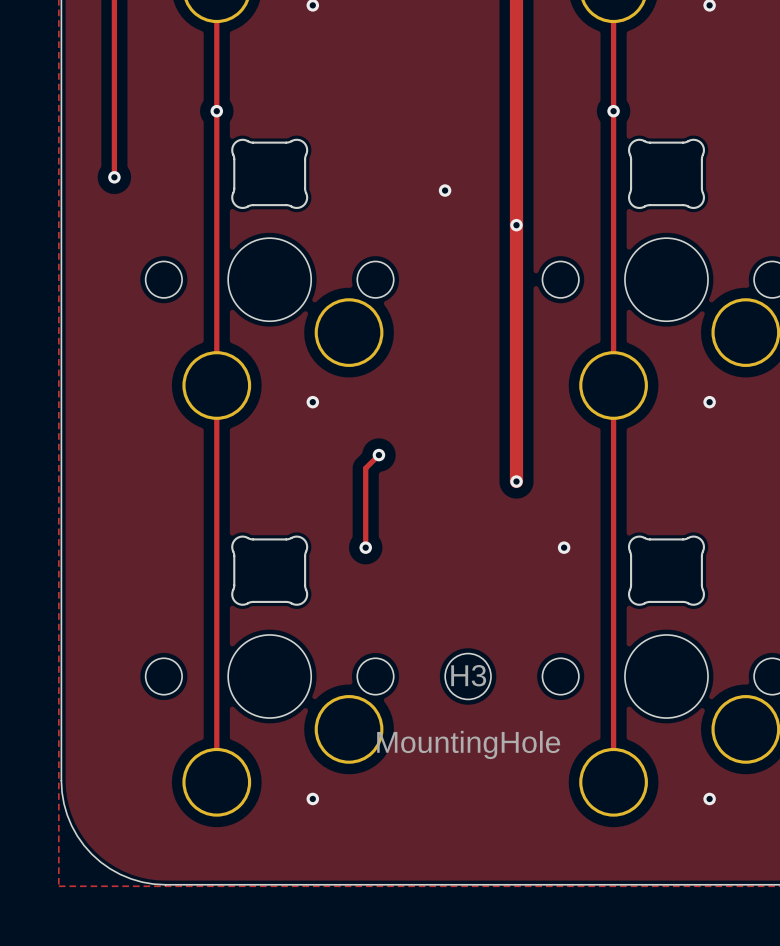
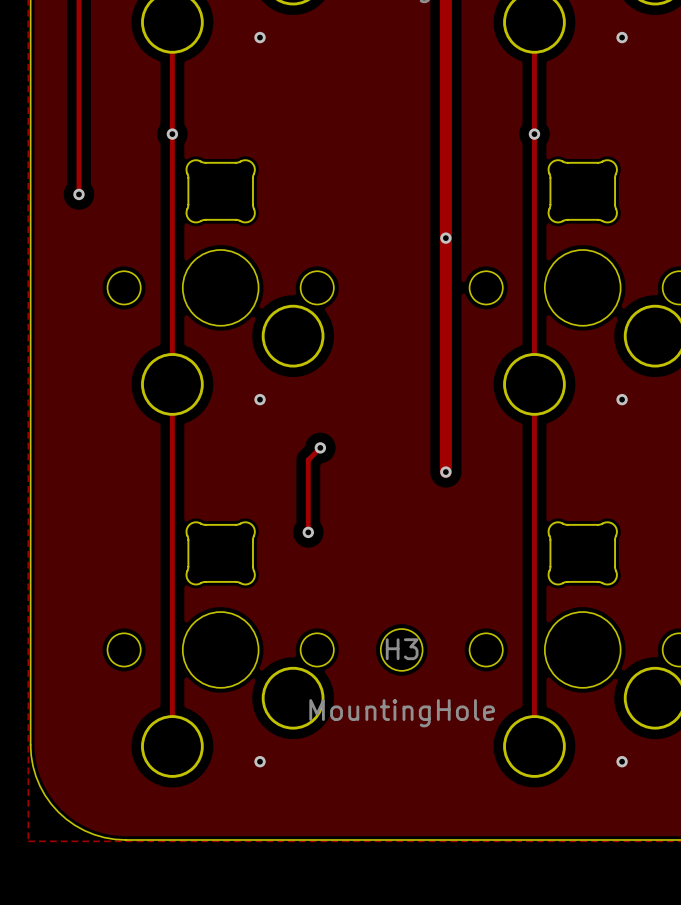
via: (445, 190) -> none
via: (564, 547) -> none

